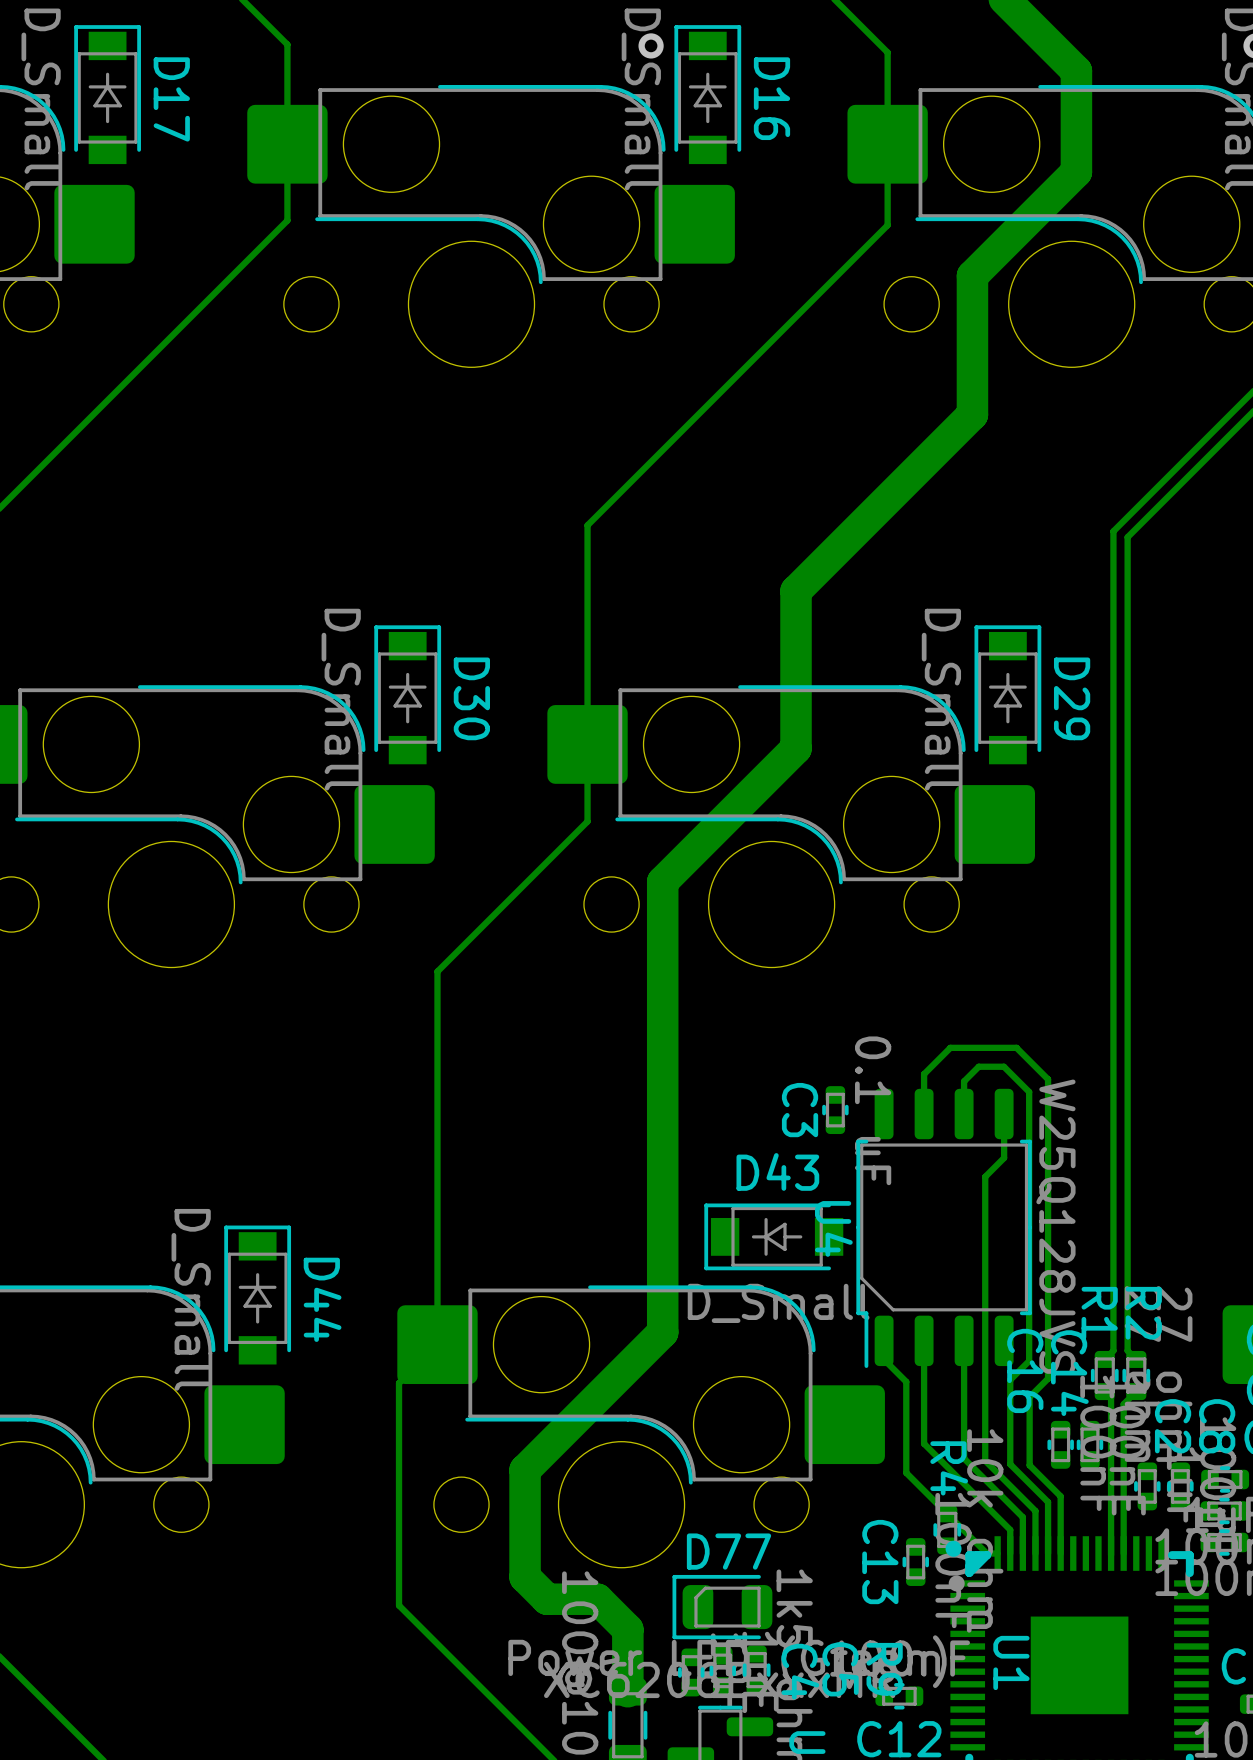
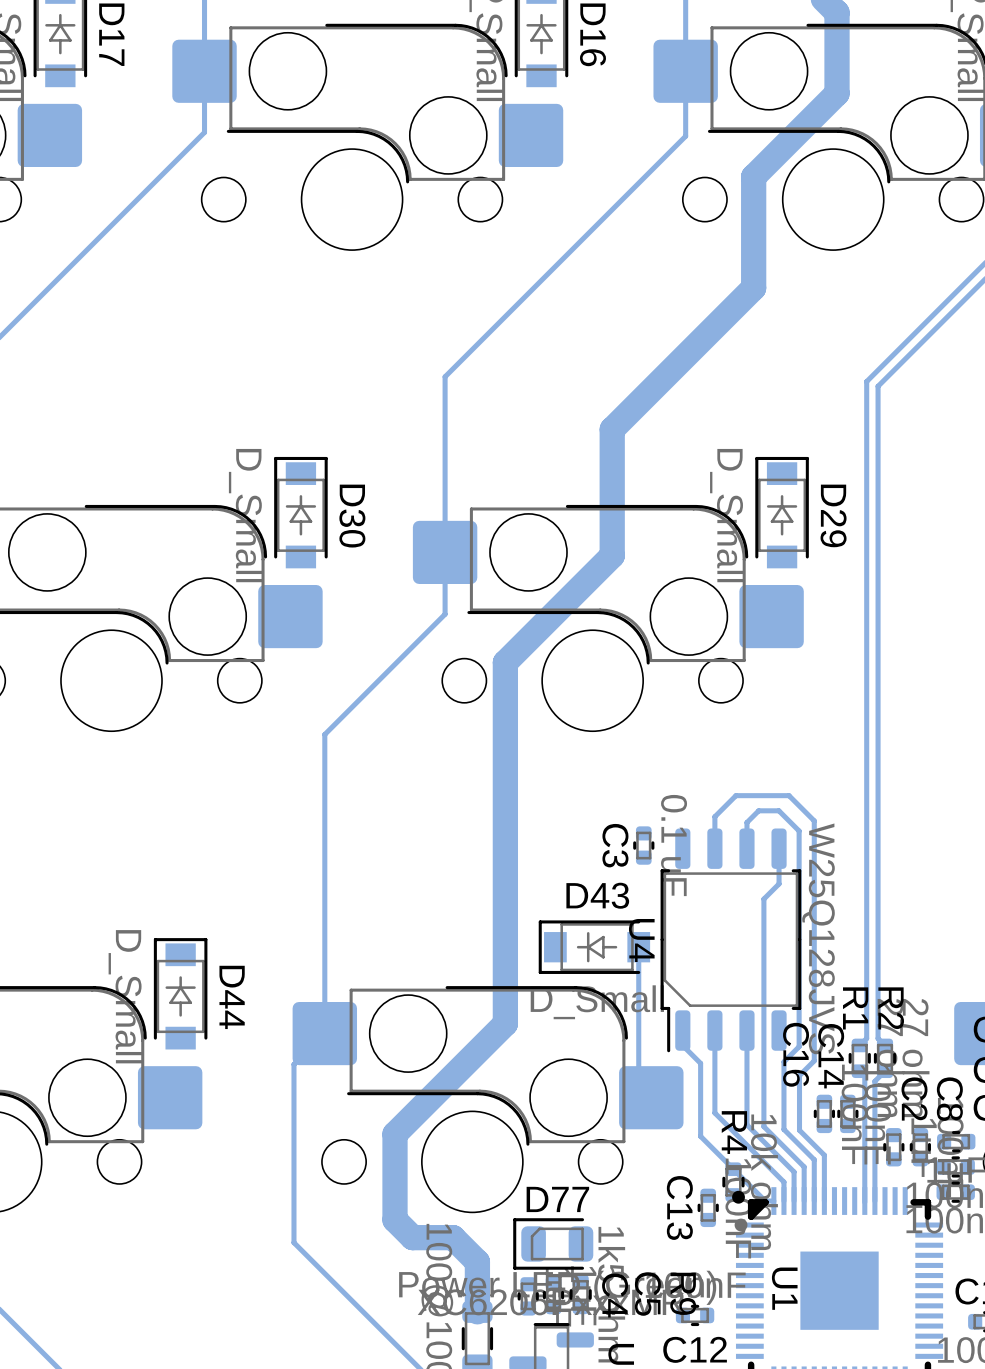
track: none -> (638, 947) (638, 1085) (651, 1097)

